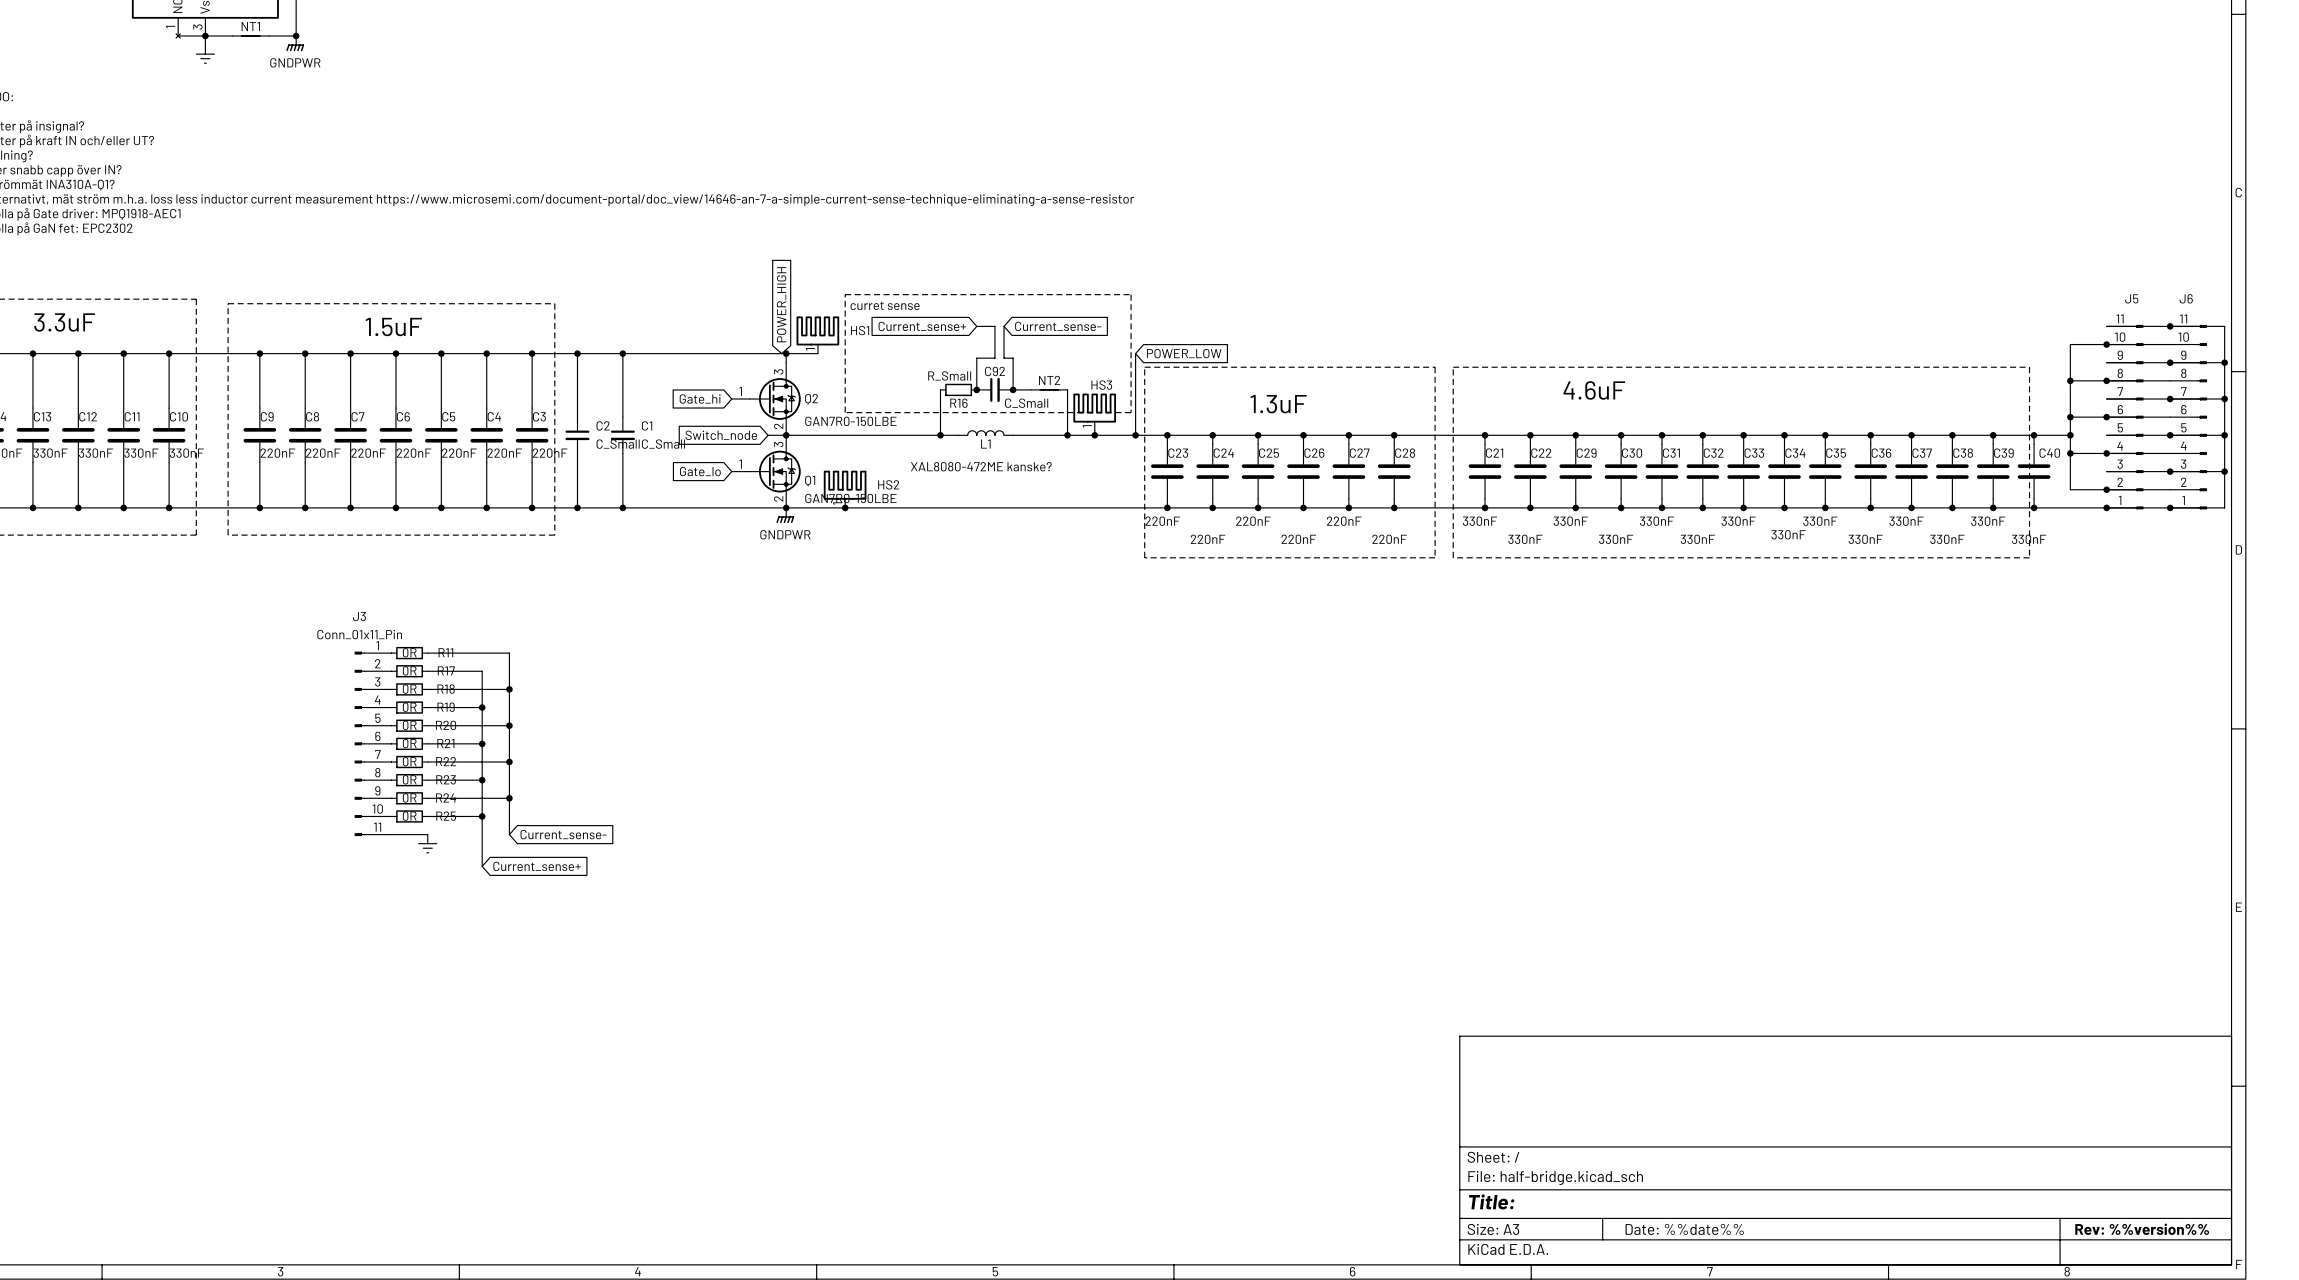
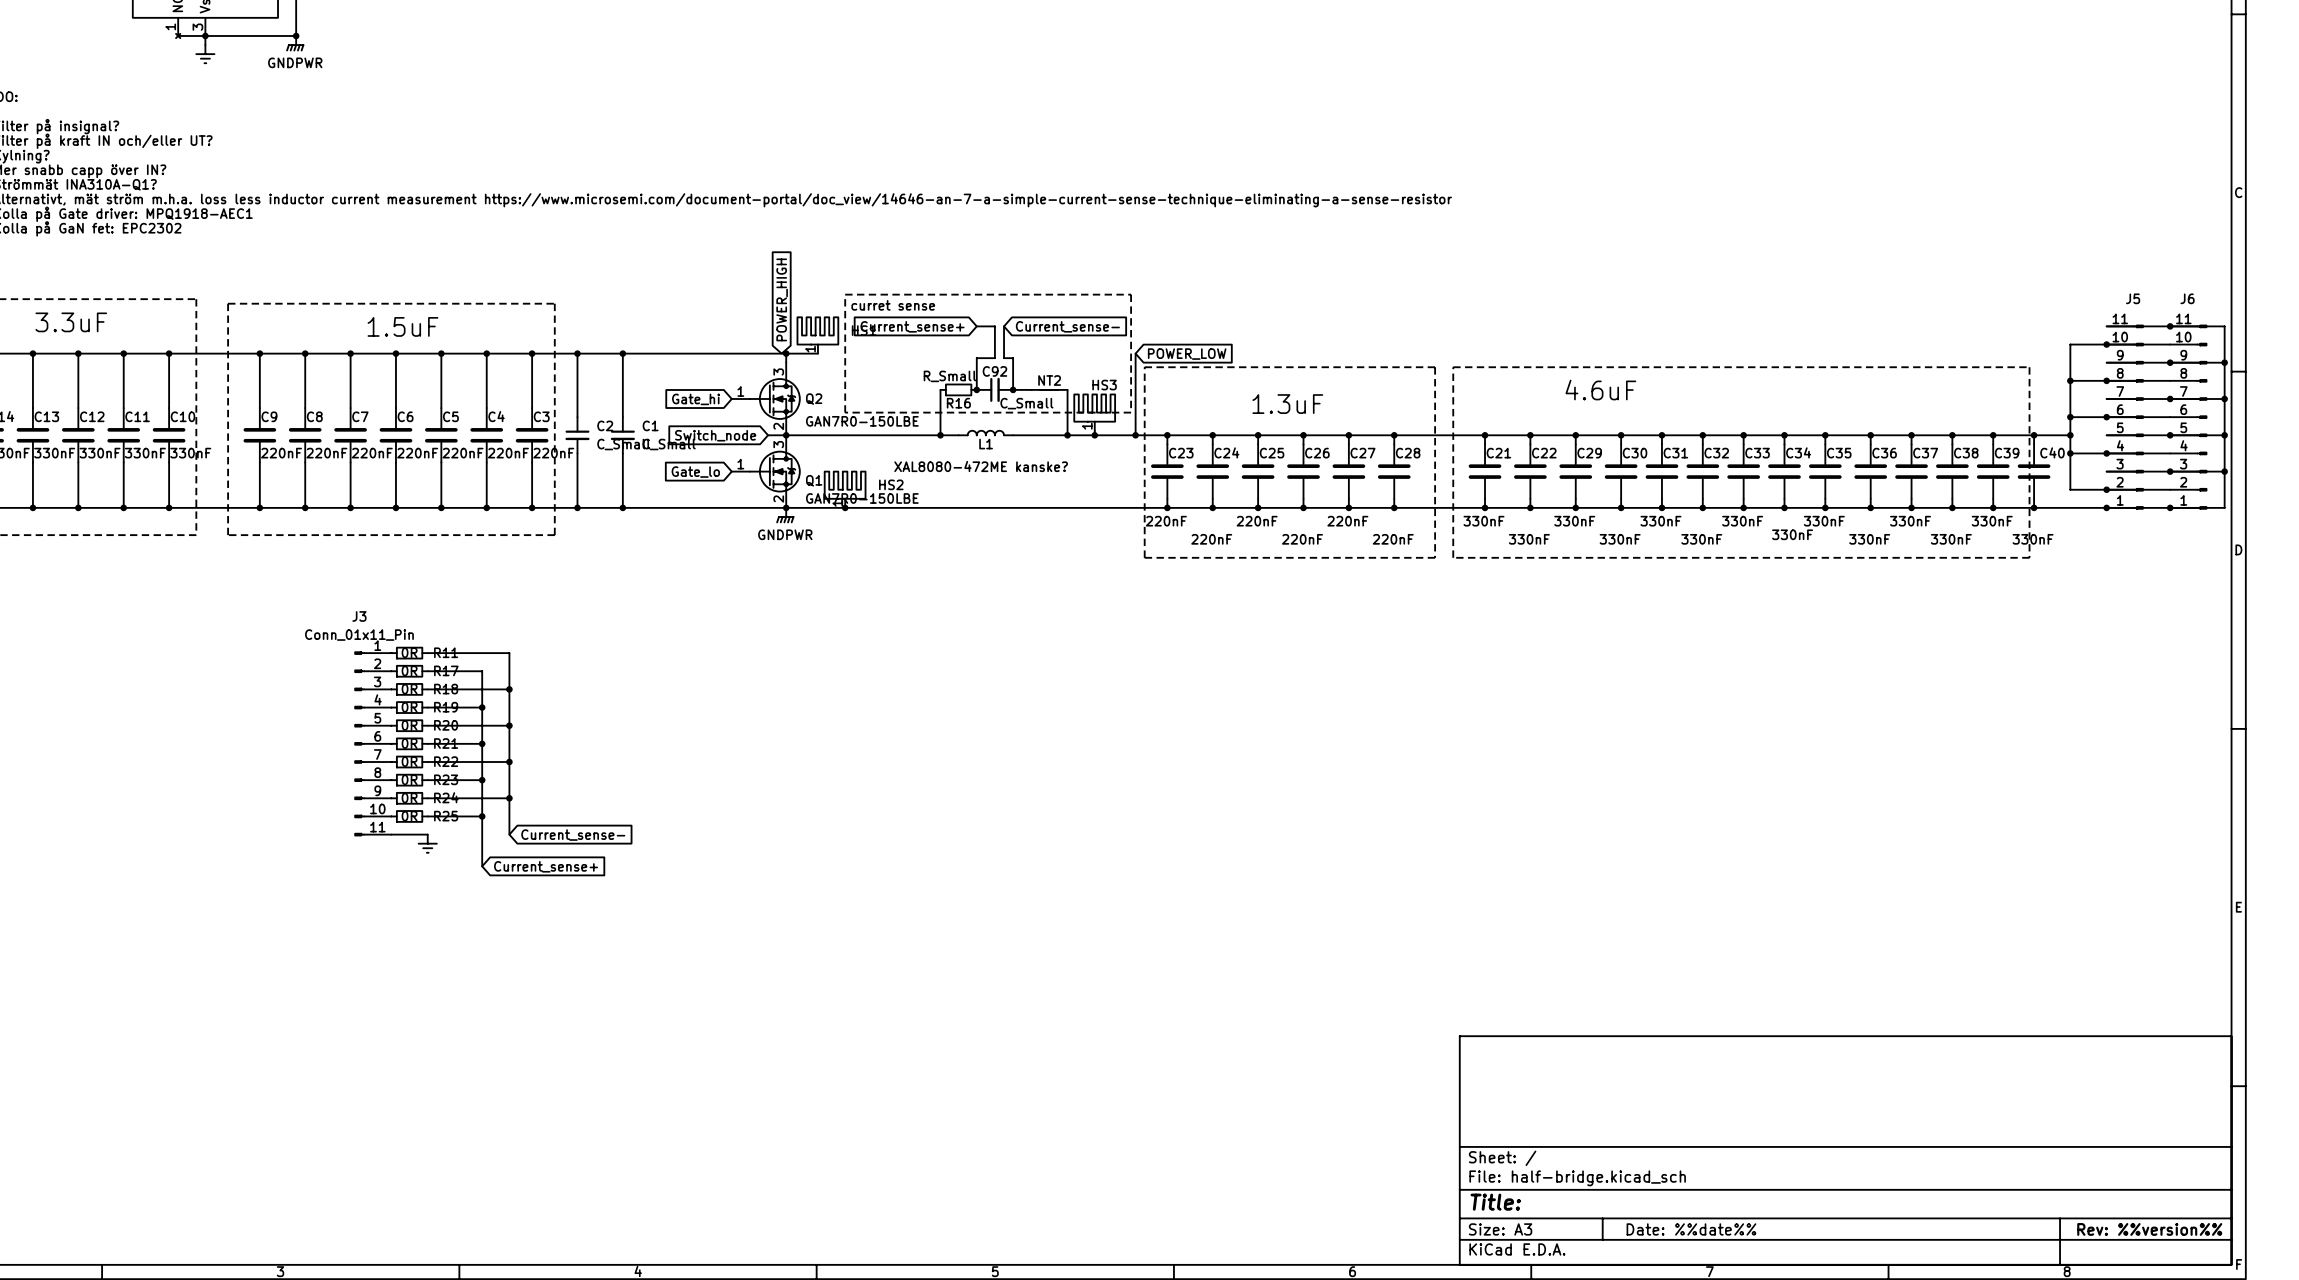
NT1: (250, 35) -> none

